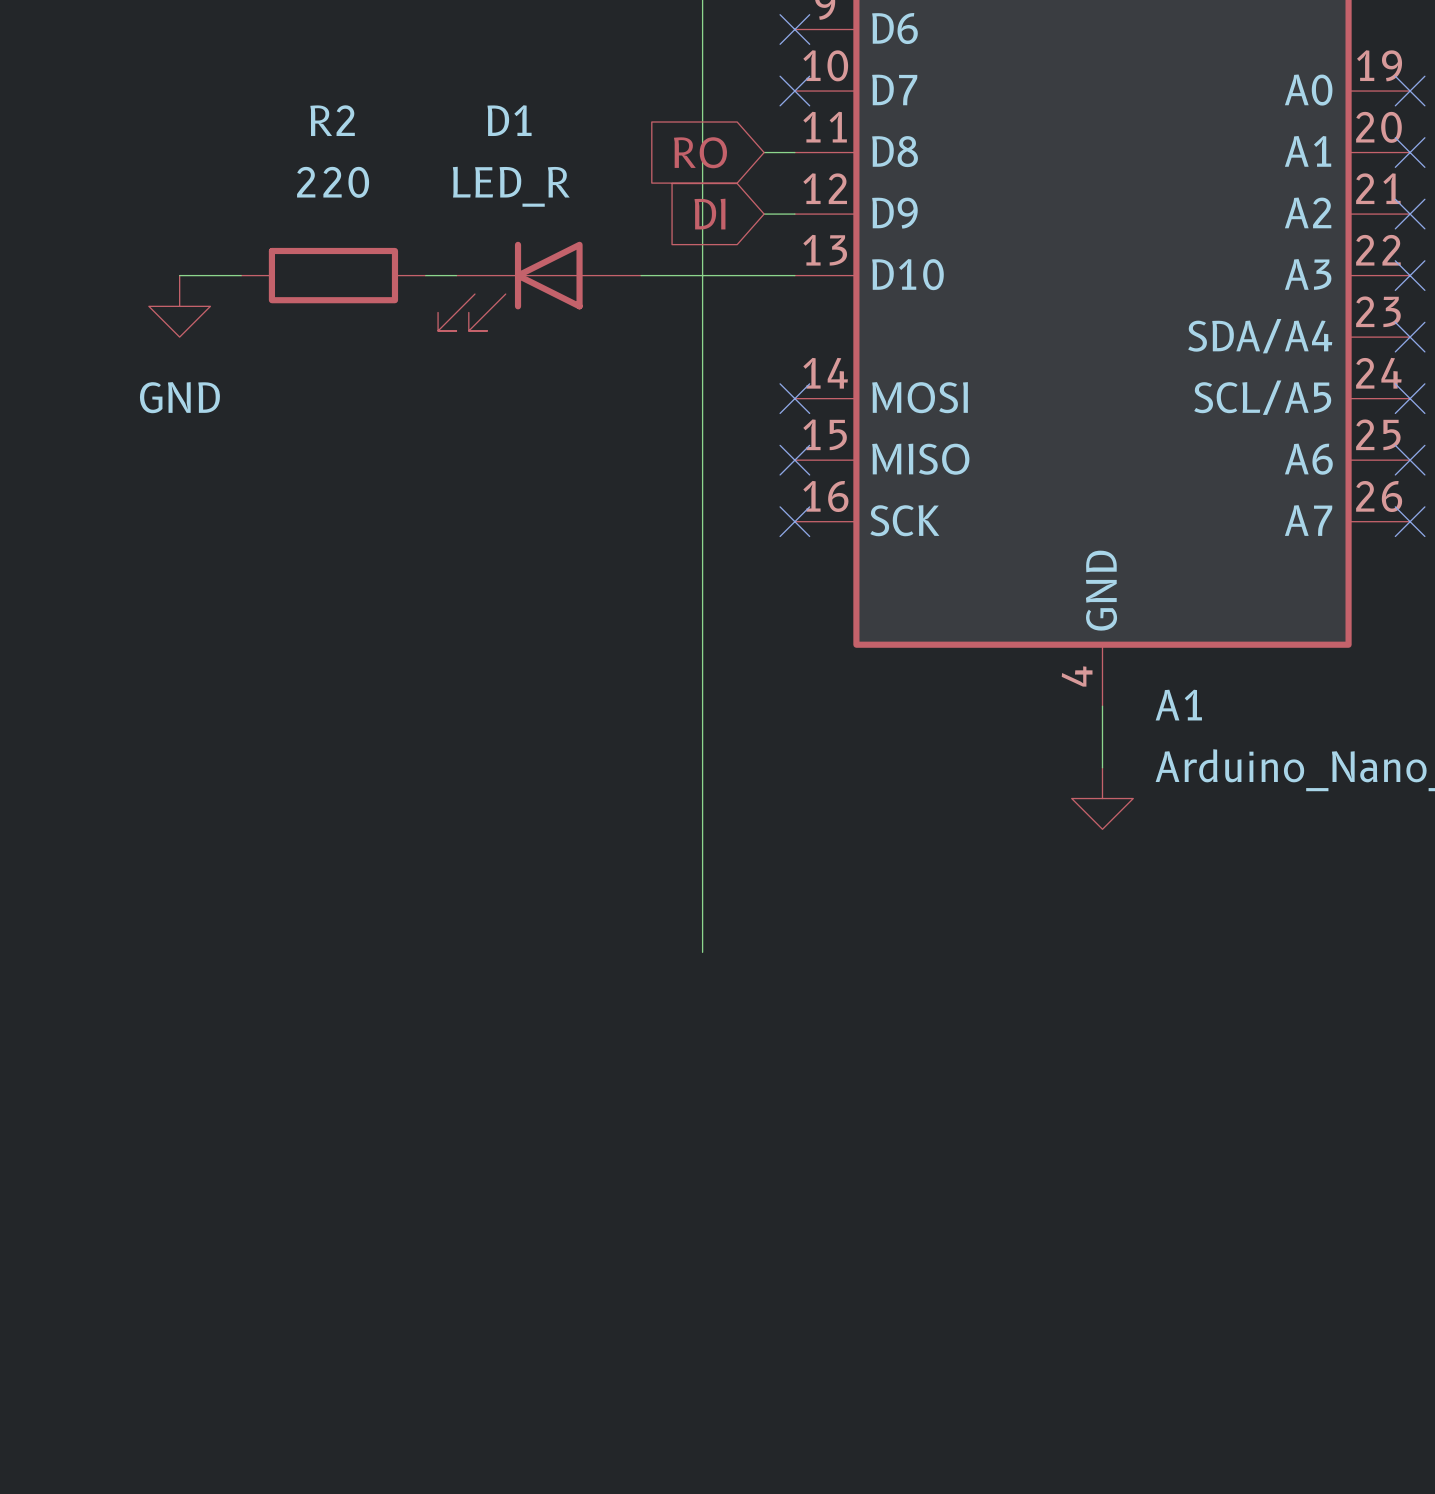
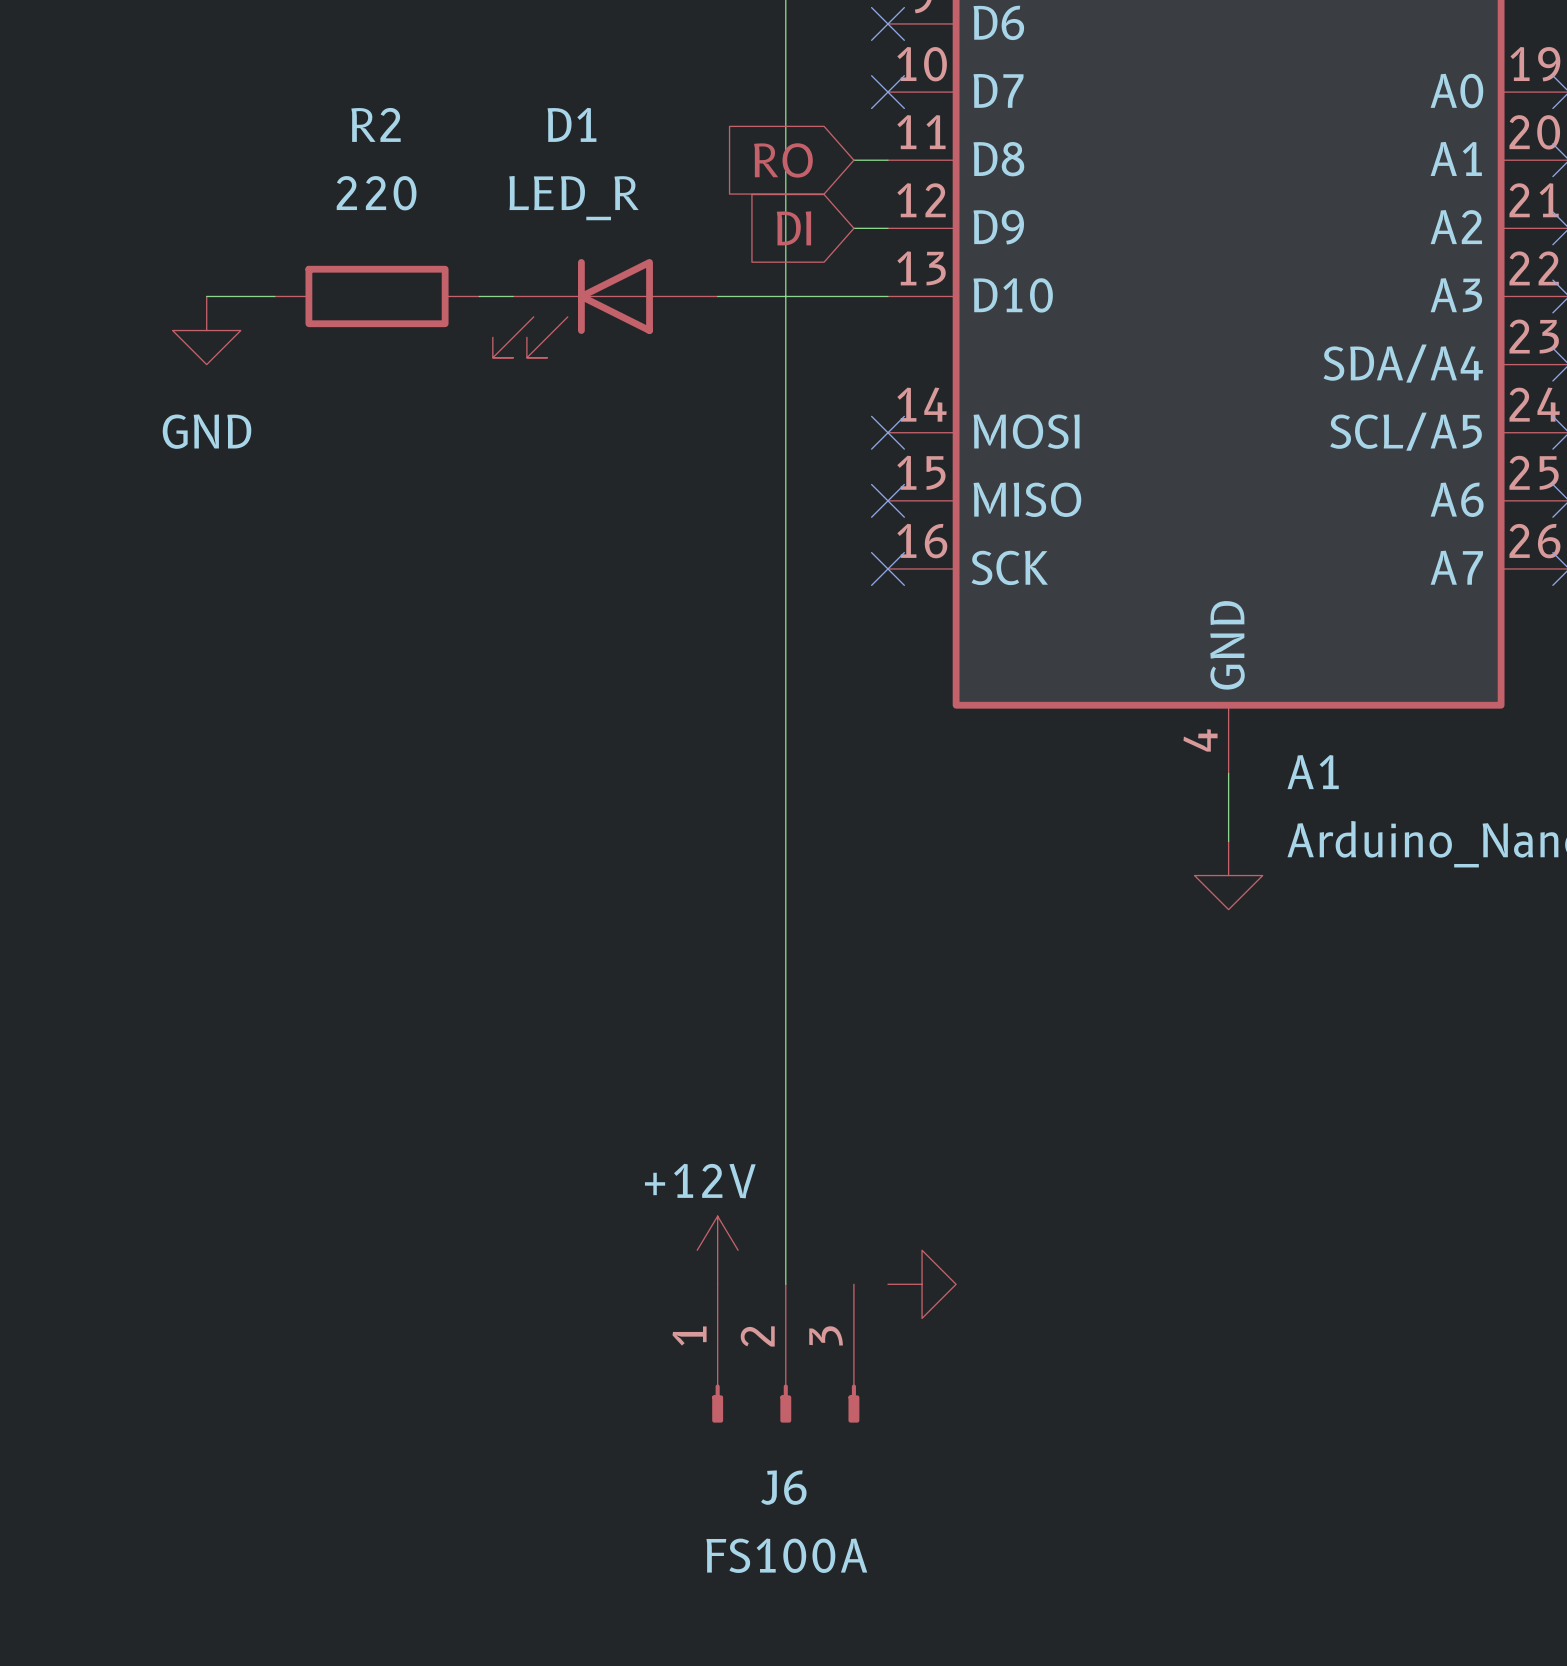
wire: none -> (785, 1045) (785, 1284)
power symbol: none -> +12V (717, 1250)
power symbol: none -> (922, 1284)
J6: none -> FS100A (785, 1353)

